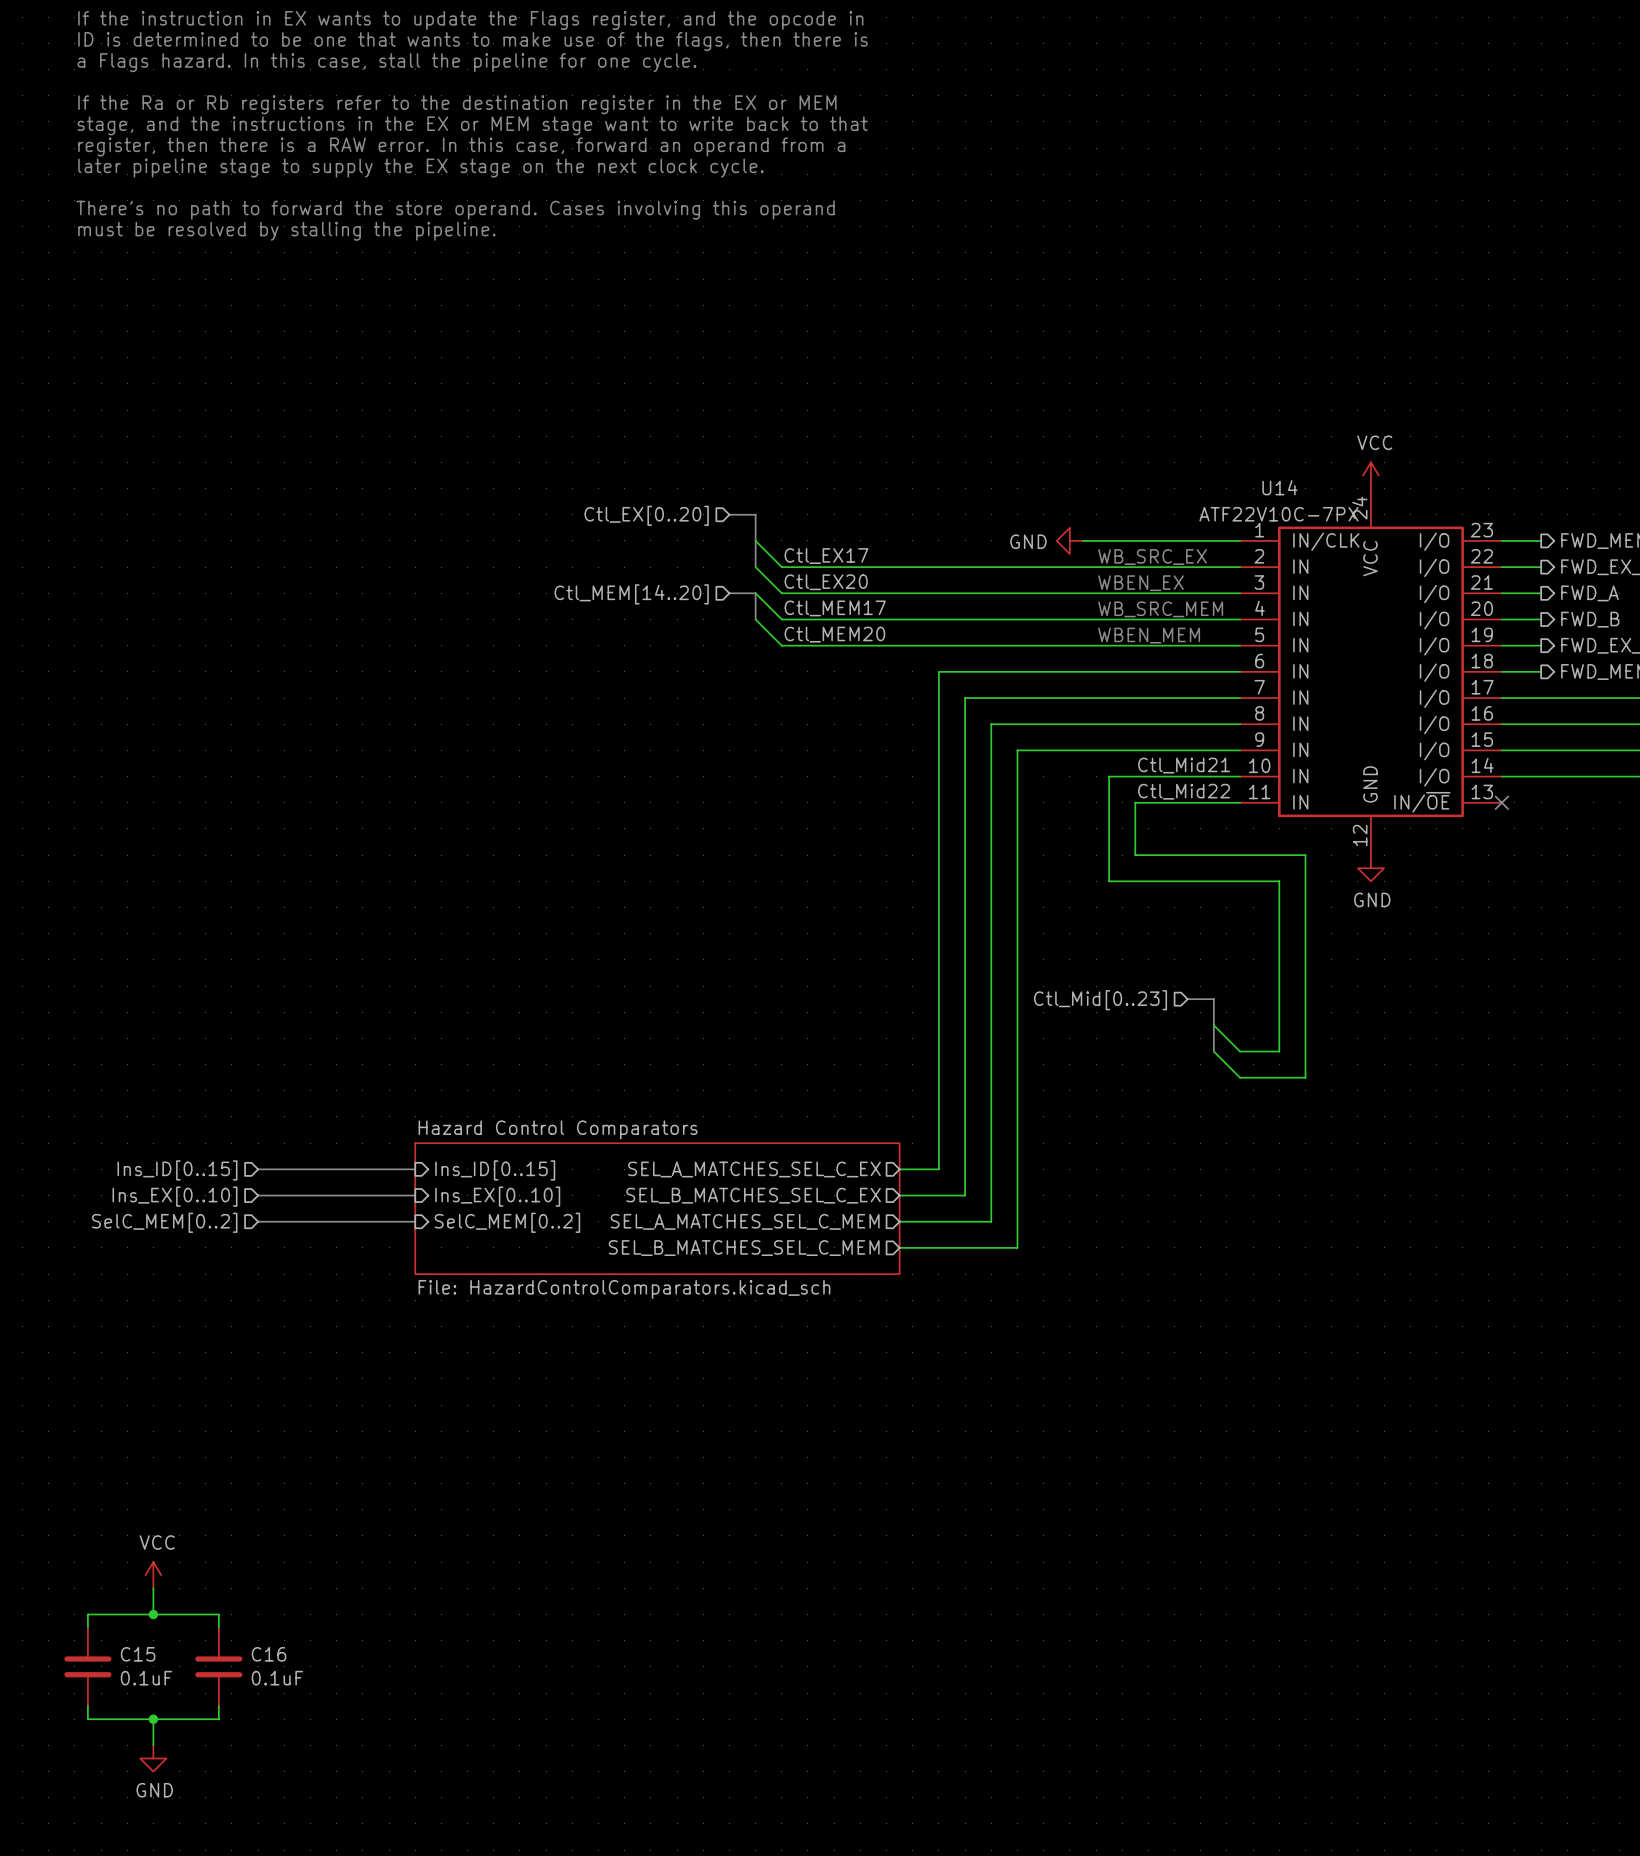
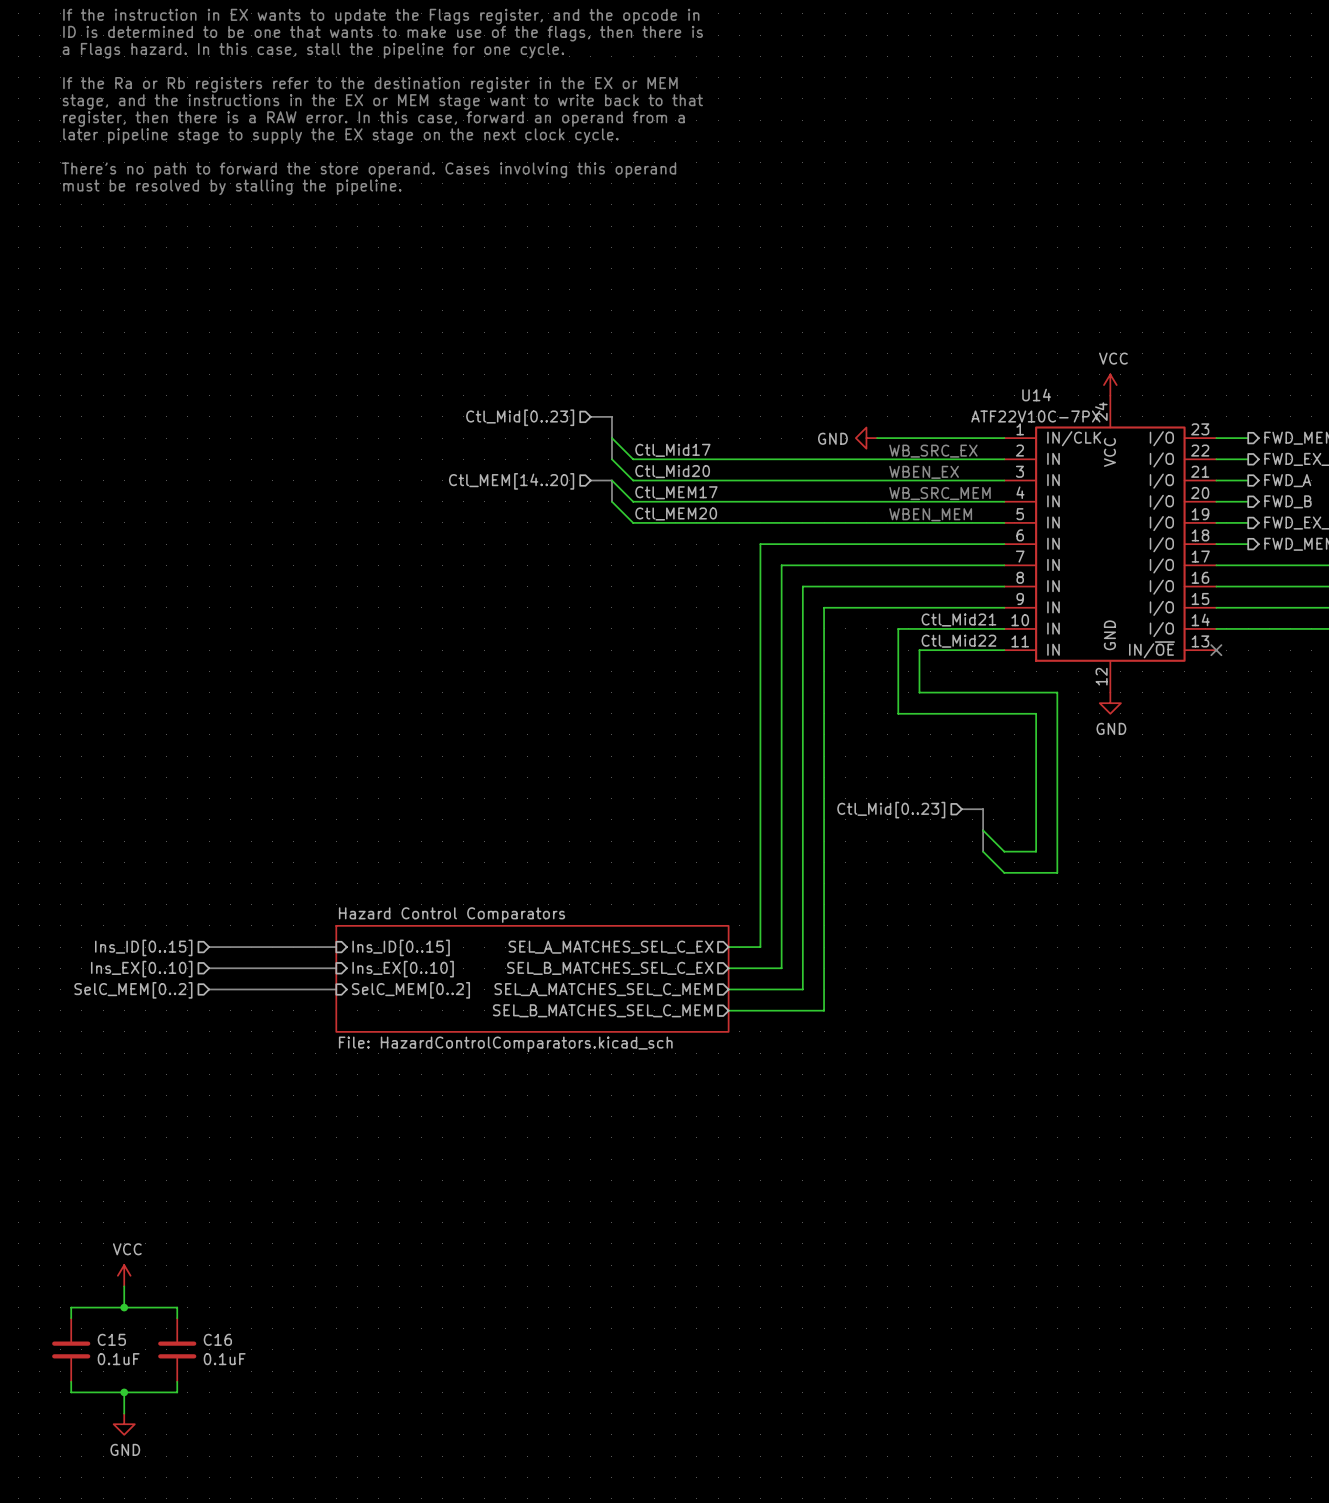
hierarchical label: Ctl_EX[0..20] (646, 515) -> Ctl_Mid[0..23] (520, 417)
label: Ctl_EX17 (826, 556) -> Ctl_Mid17 (672, 450)
label: Ctl_EX20 (826, 582) -> Ctl_Mid20 (672, 471)

